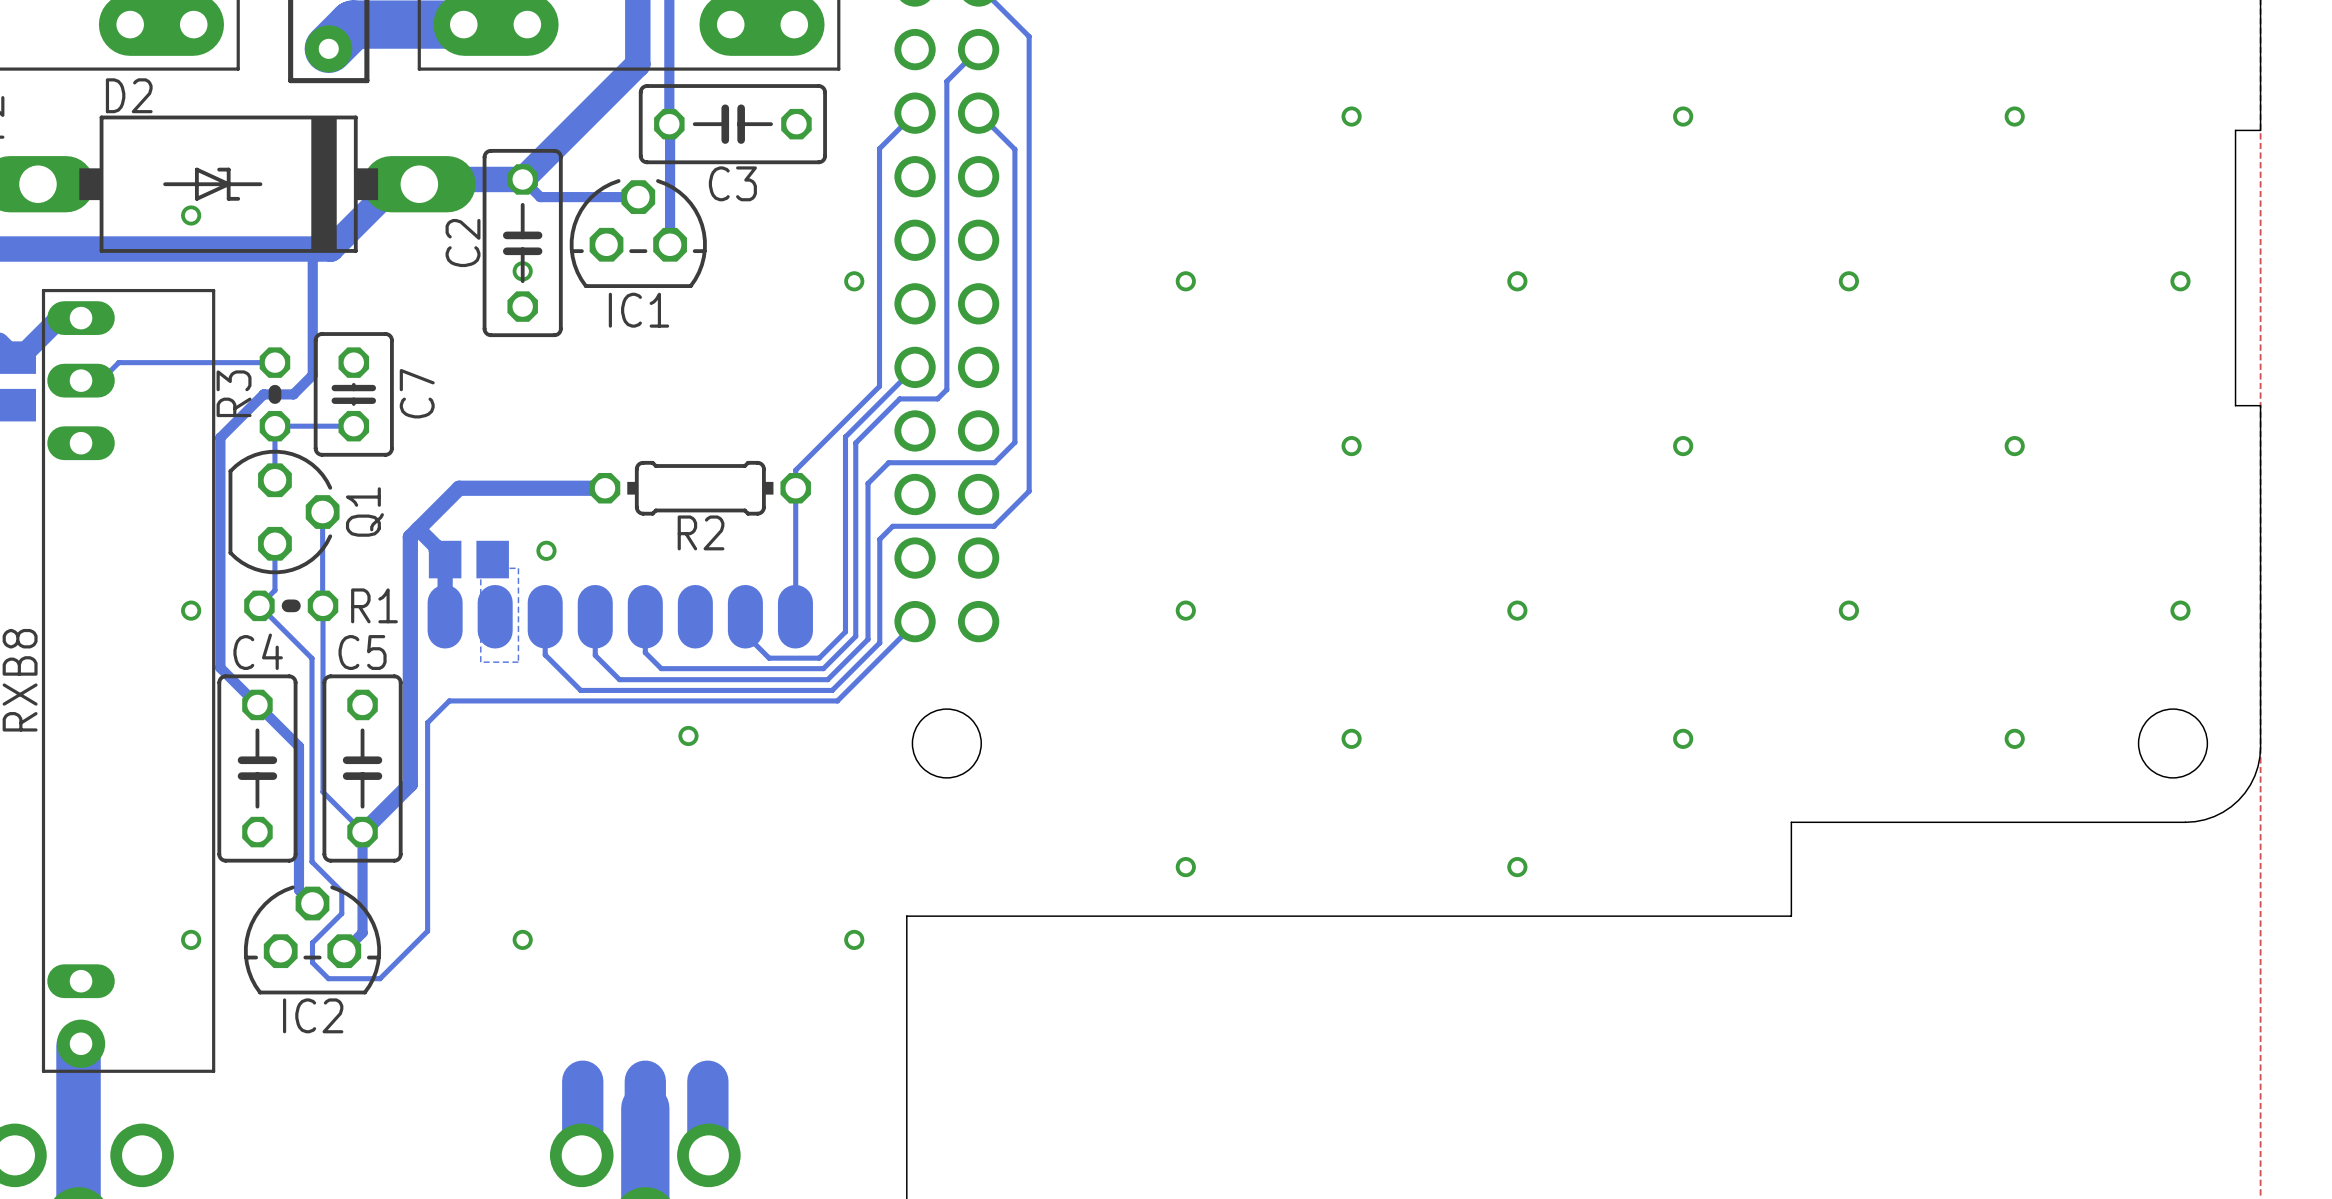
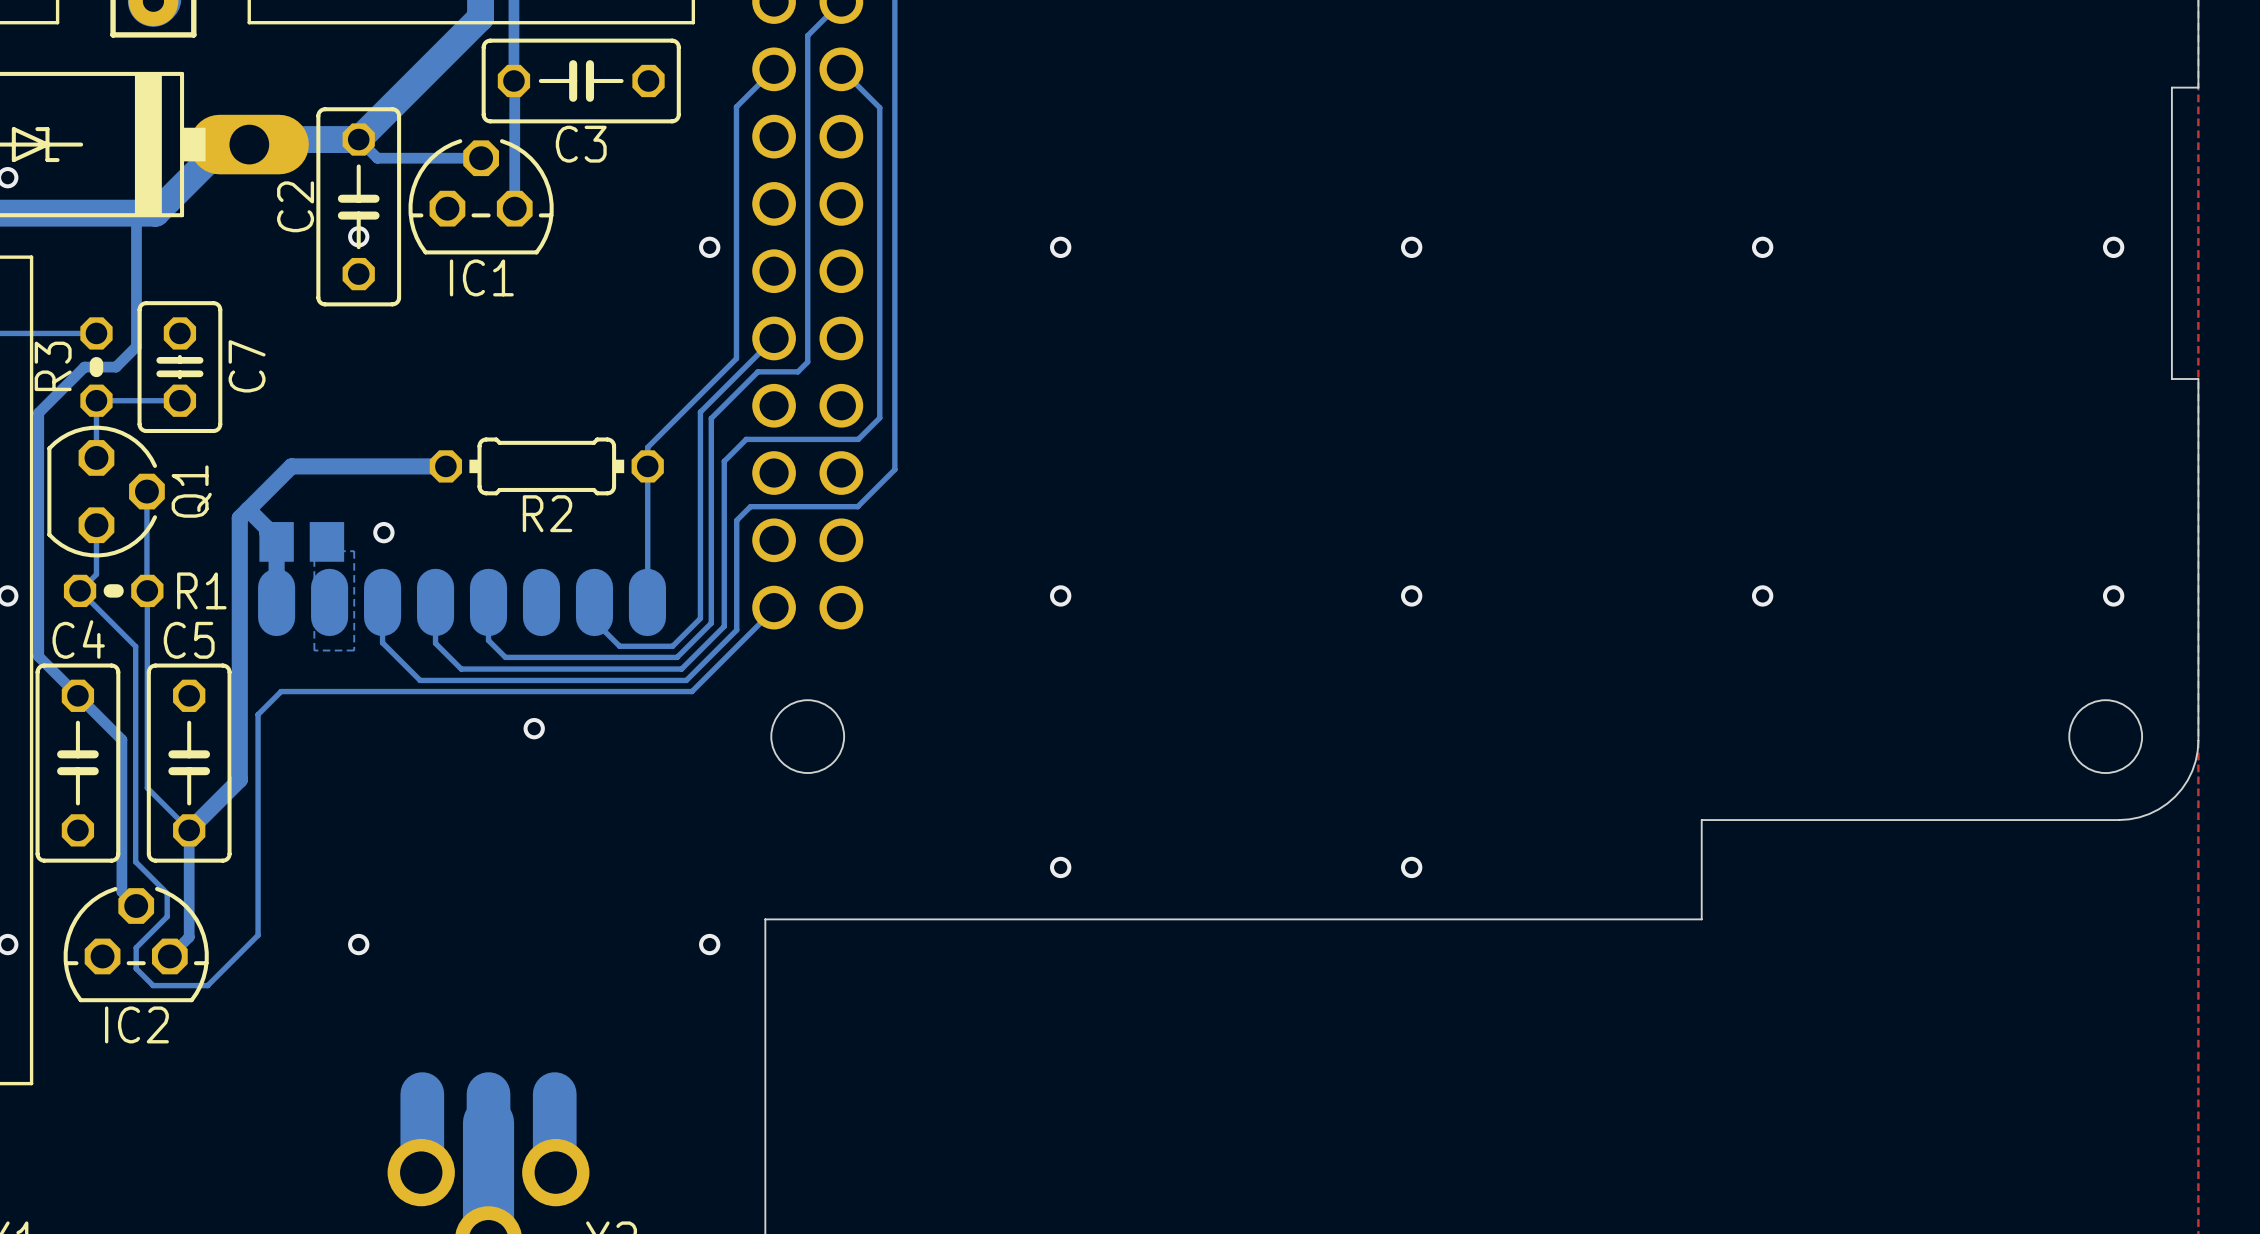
via: (1351, 116) -> none
via: (1683, 116) -> none
via: (2014, 116) -> none
via: (1351, 446) -> none
via: (1683, 446) -> none
via: (2014, 446) -> none
via: (1351, 738) -> none
via: (1683, 738) -> none
via: (2014, 738) -> none

